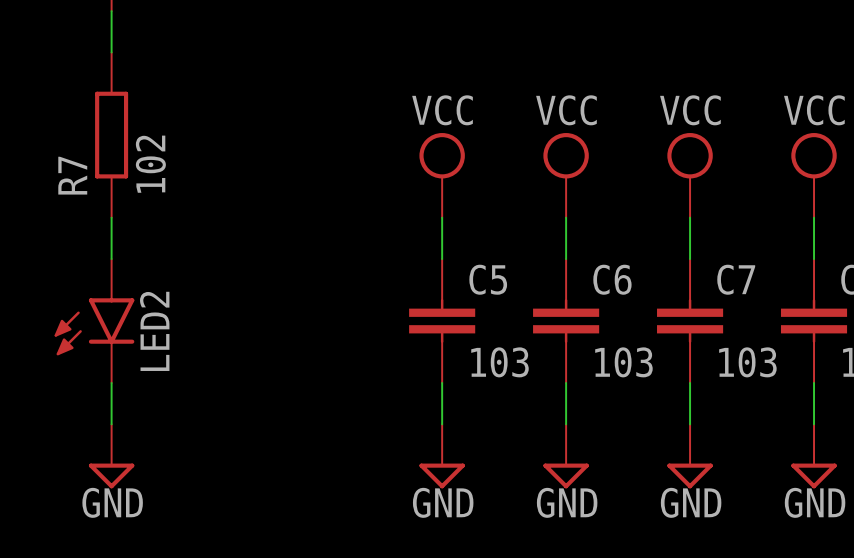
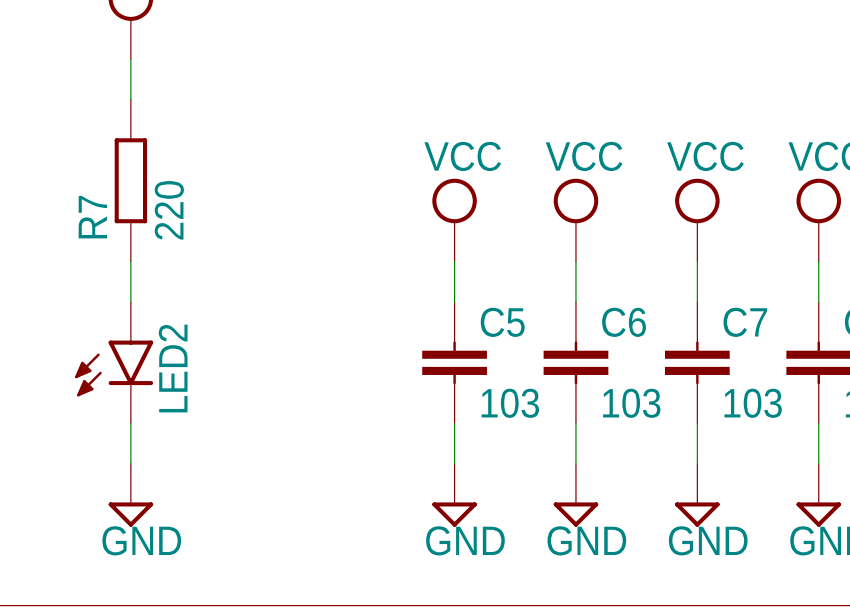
R7 value: 102 (150, 164) -> 220 (169, 210)

